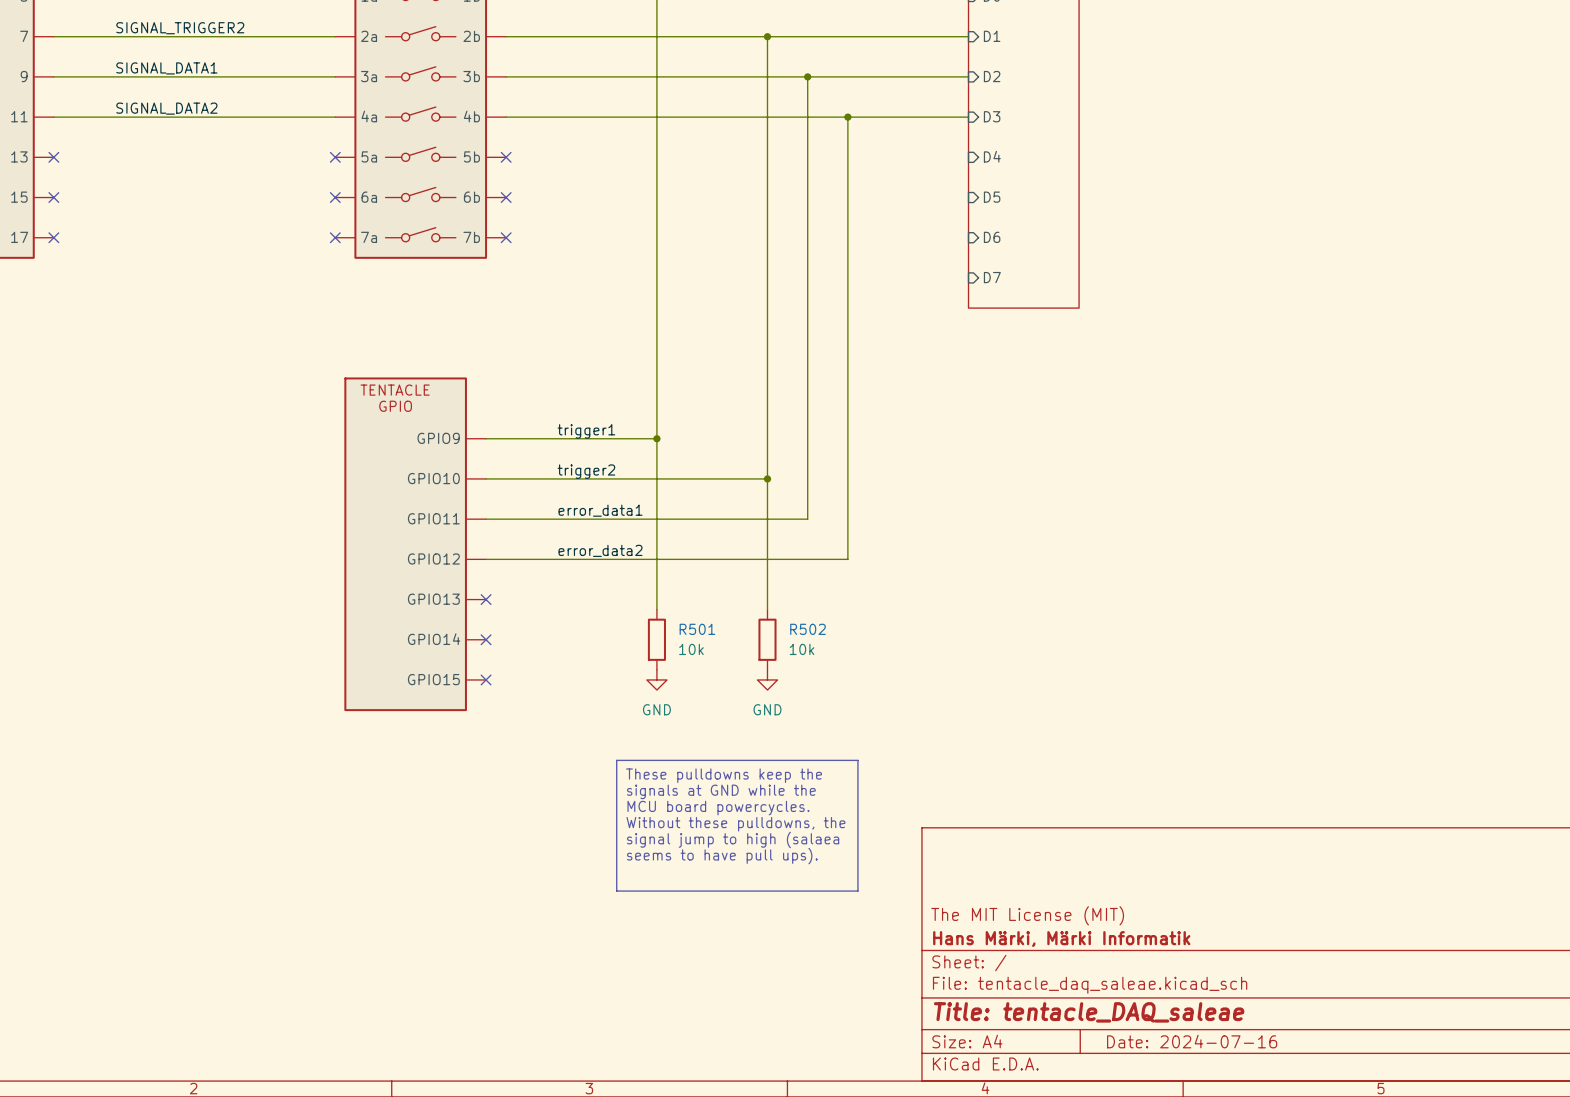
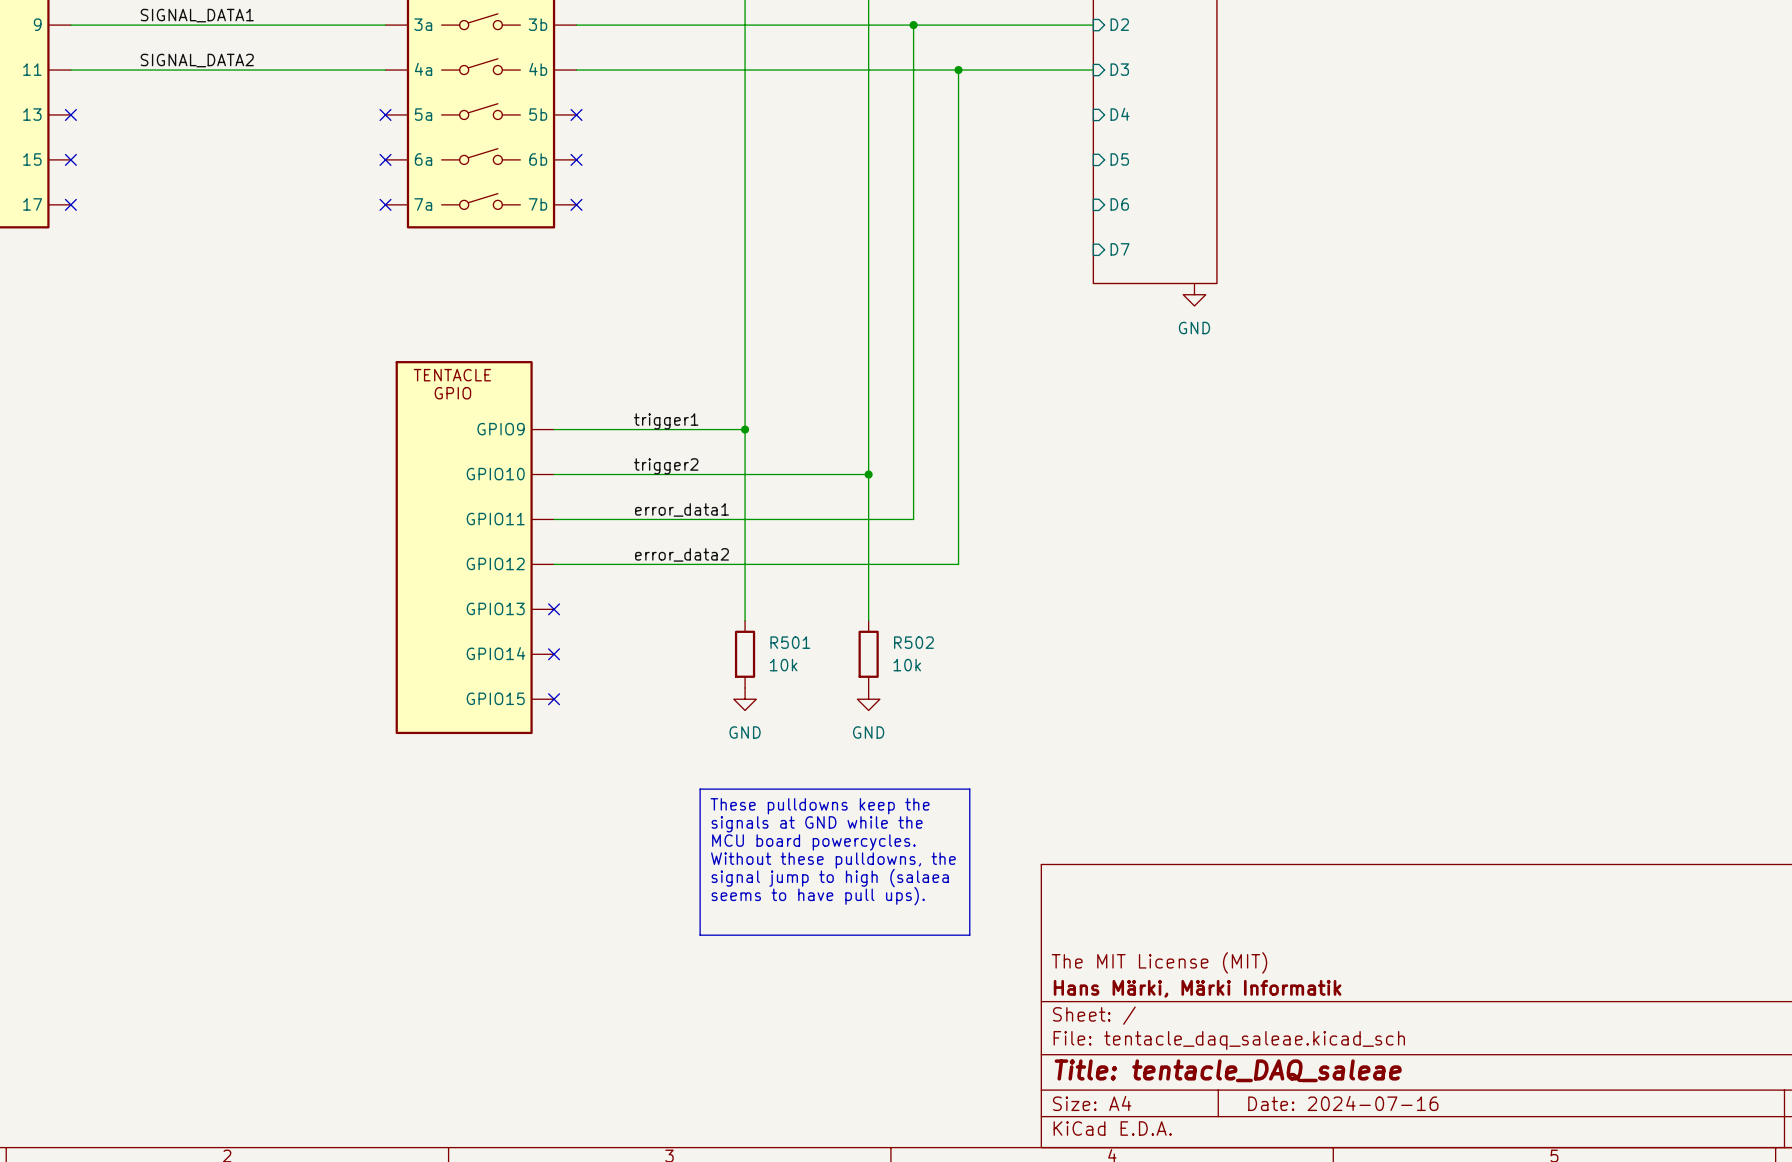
power symbol: none -> GND (1194, 294)

